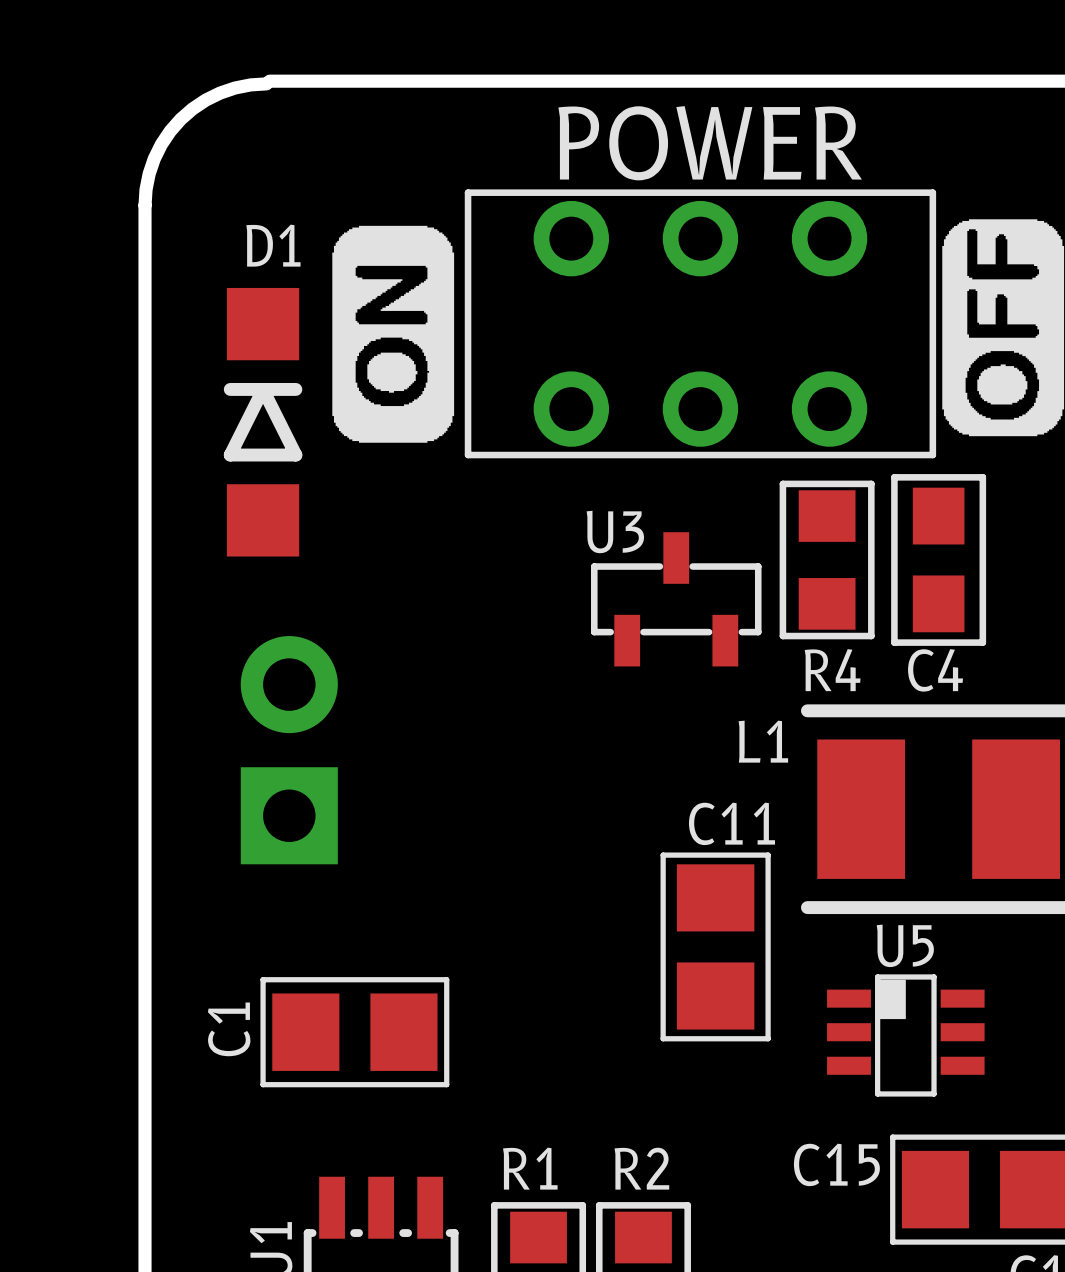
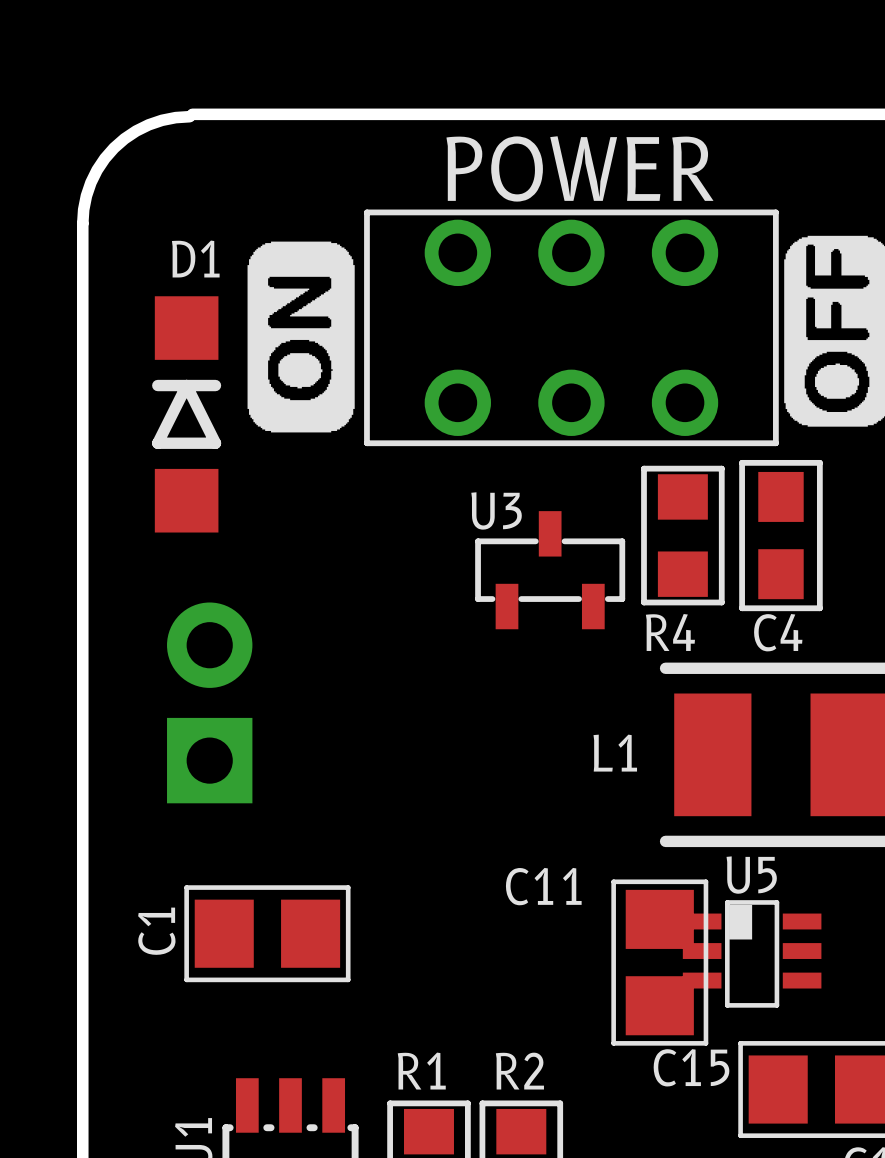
R4 name position: R4 (832, 670) -> R4 (670, 632)
L1 name position: L1 (763, 741) -> L1 (615, 753)
C11 name position: C11 (731, 823) -> C11 (543, 886)
C11 position: (715, 946) -> (659, 962)
C1 position: (354, 1032) -> (267, 933)

